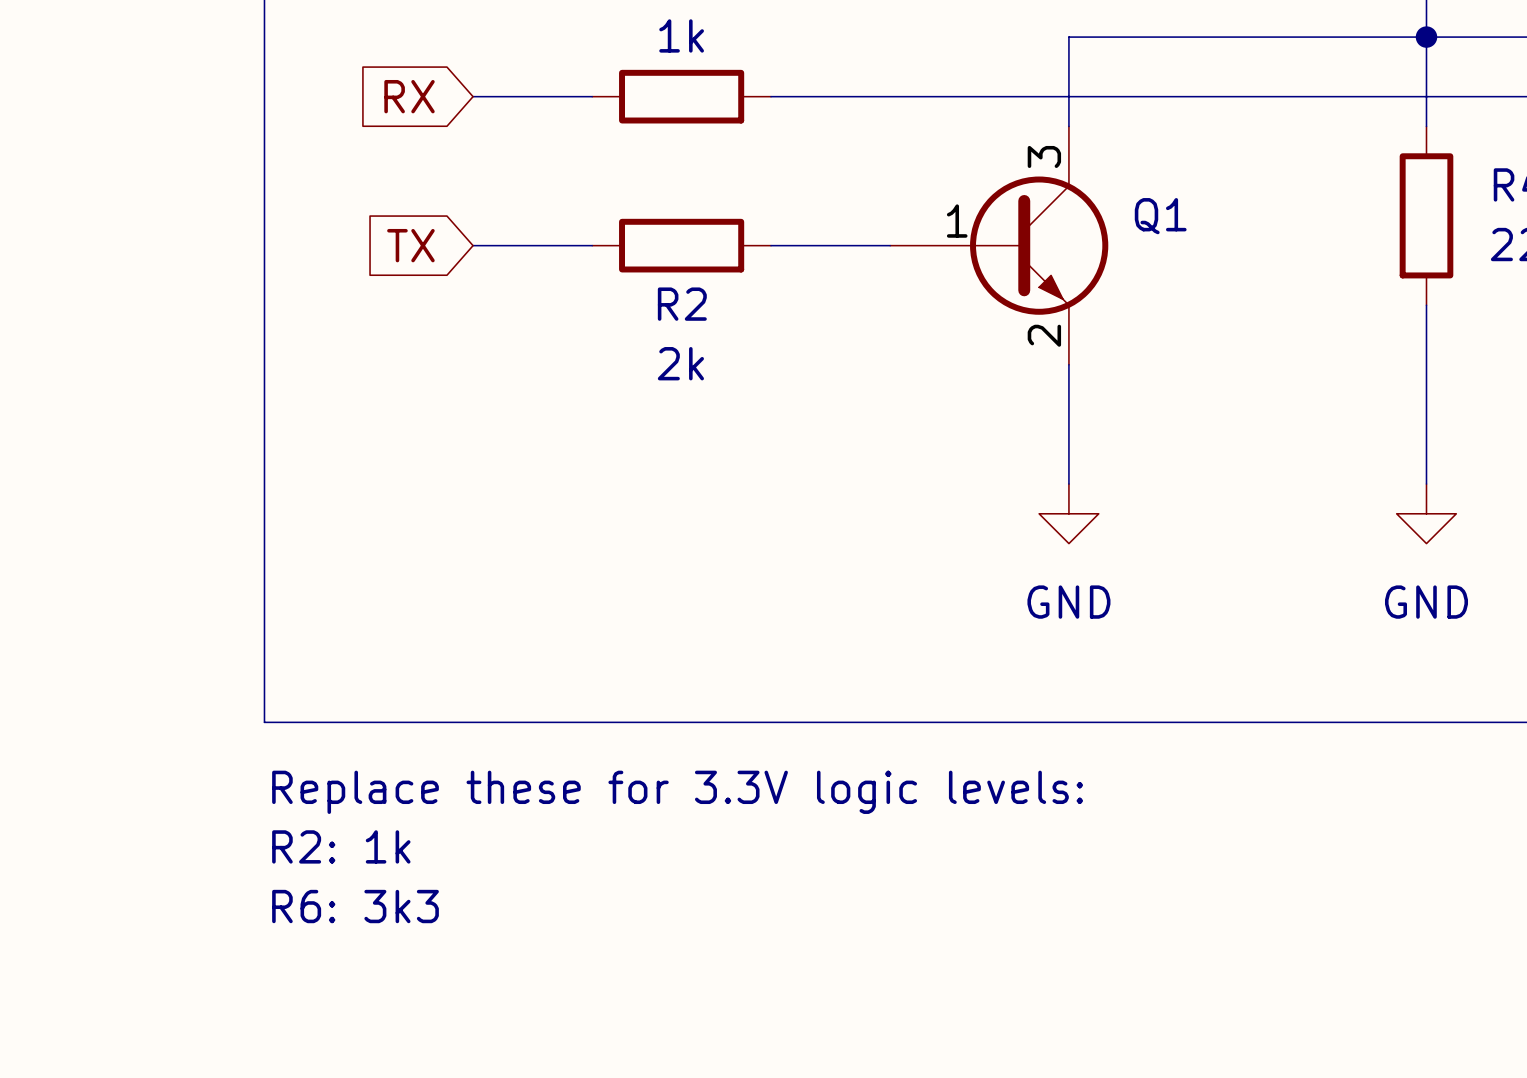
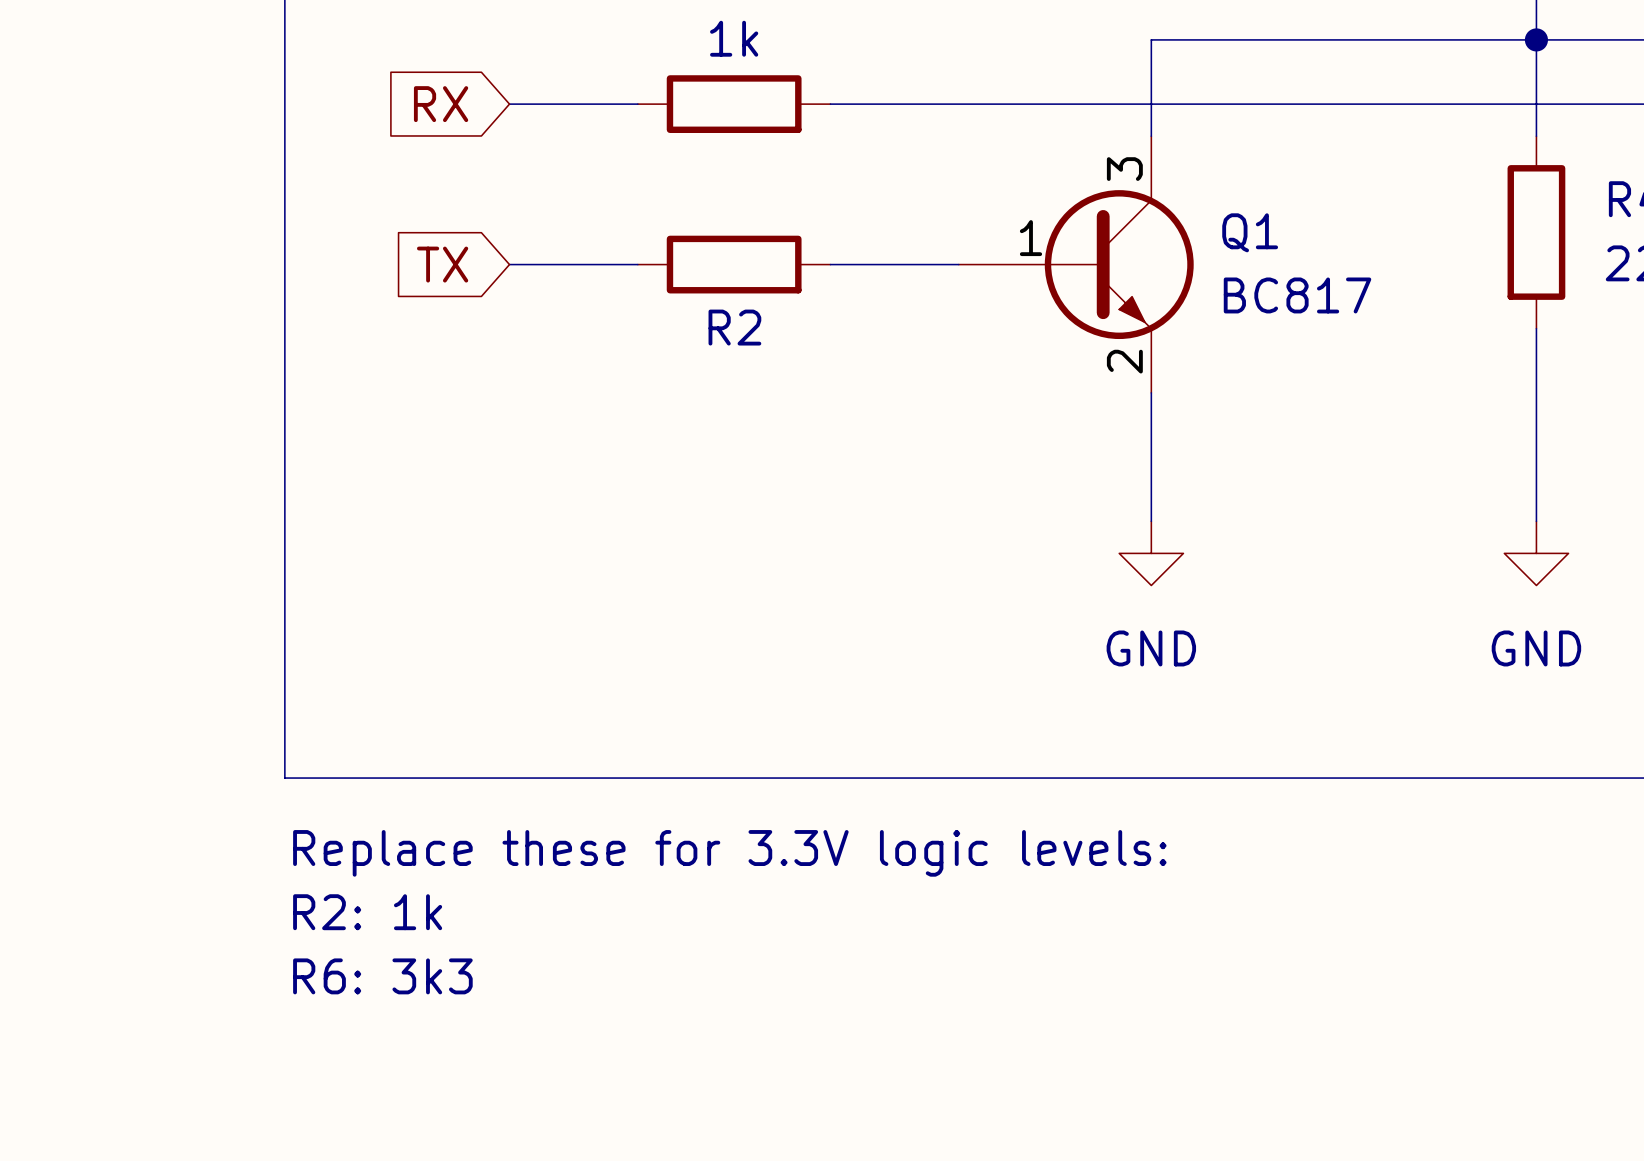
Q1 value: none -> BC817 (1297, 295)
R2 value: 2k (680, 363) -> none

